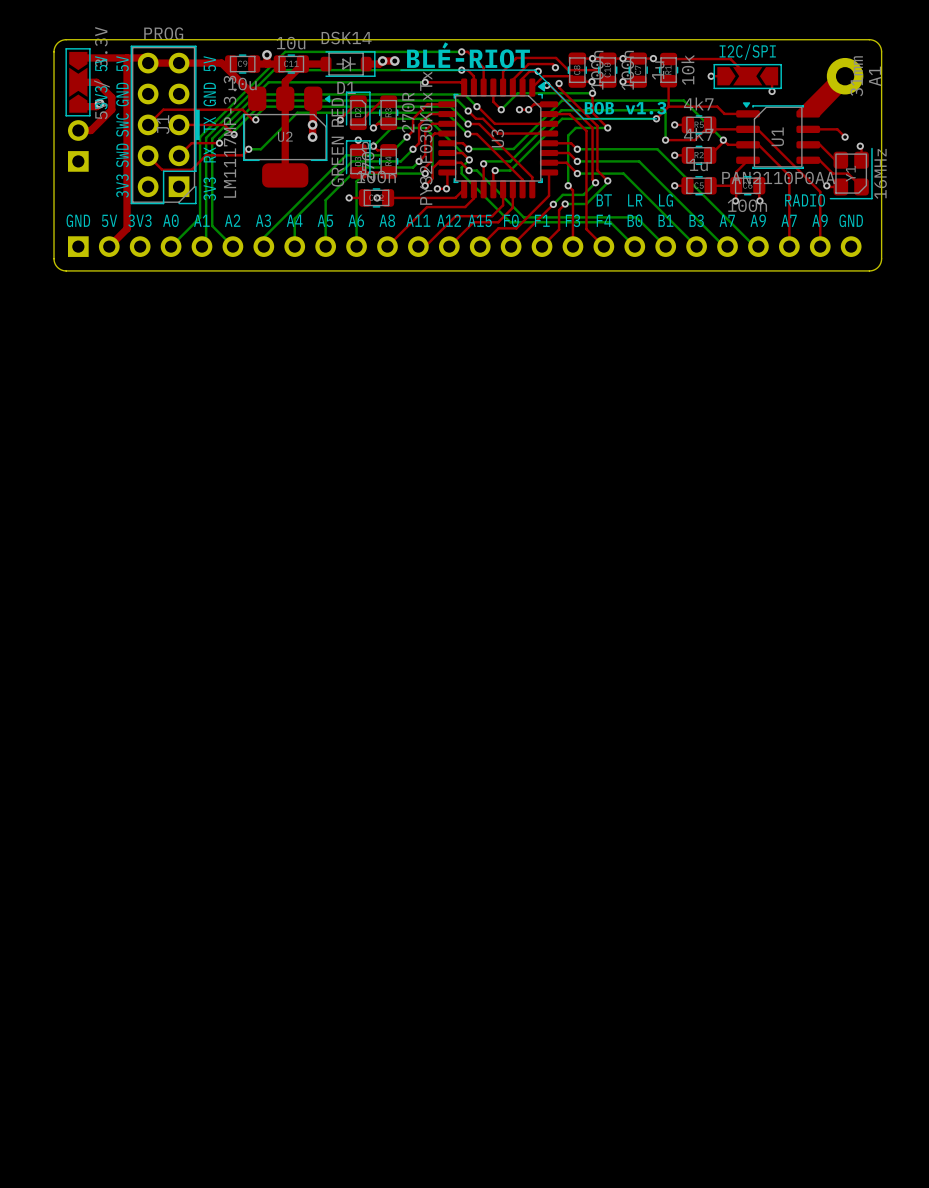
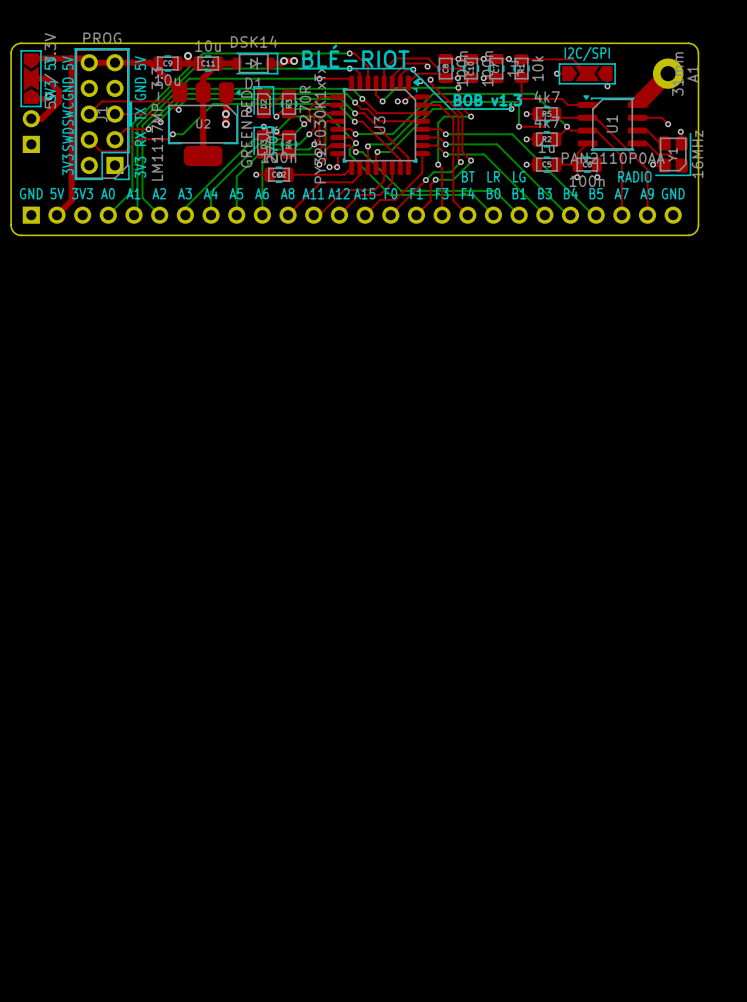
text: A7 (727, 220) -> B4 (570, 193)
text: A9 (758, 220) -> B5 (596, 193)

